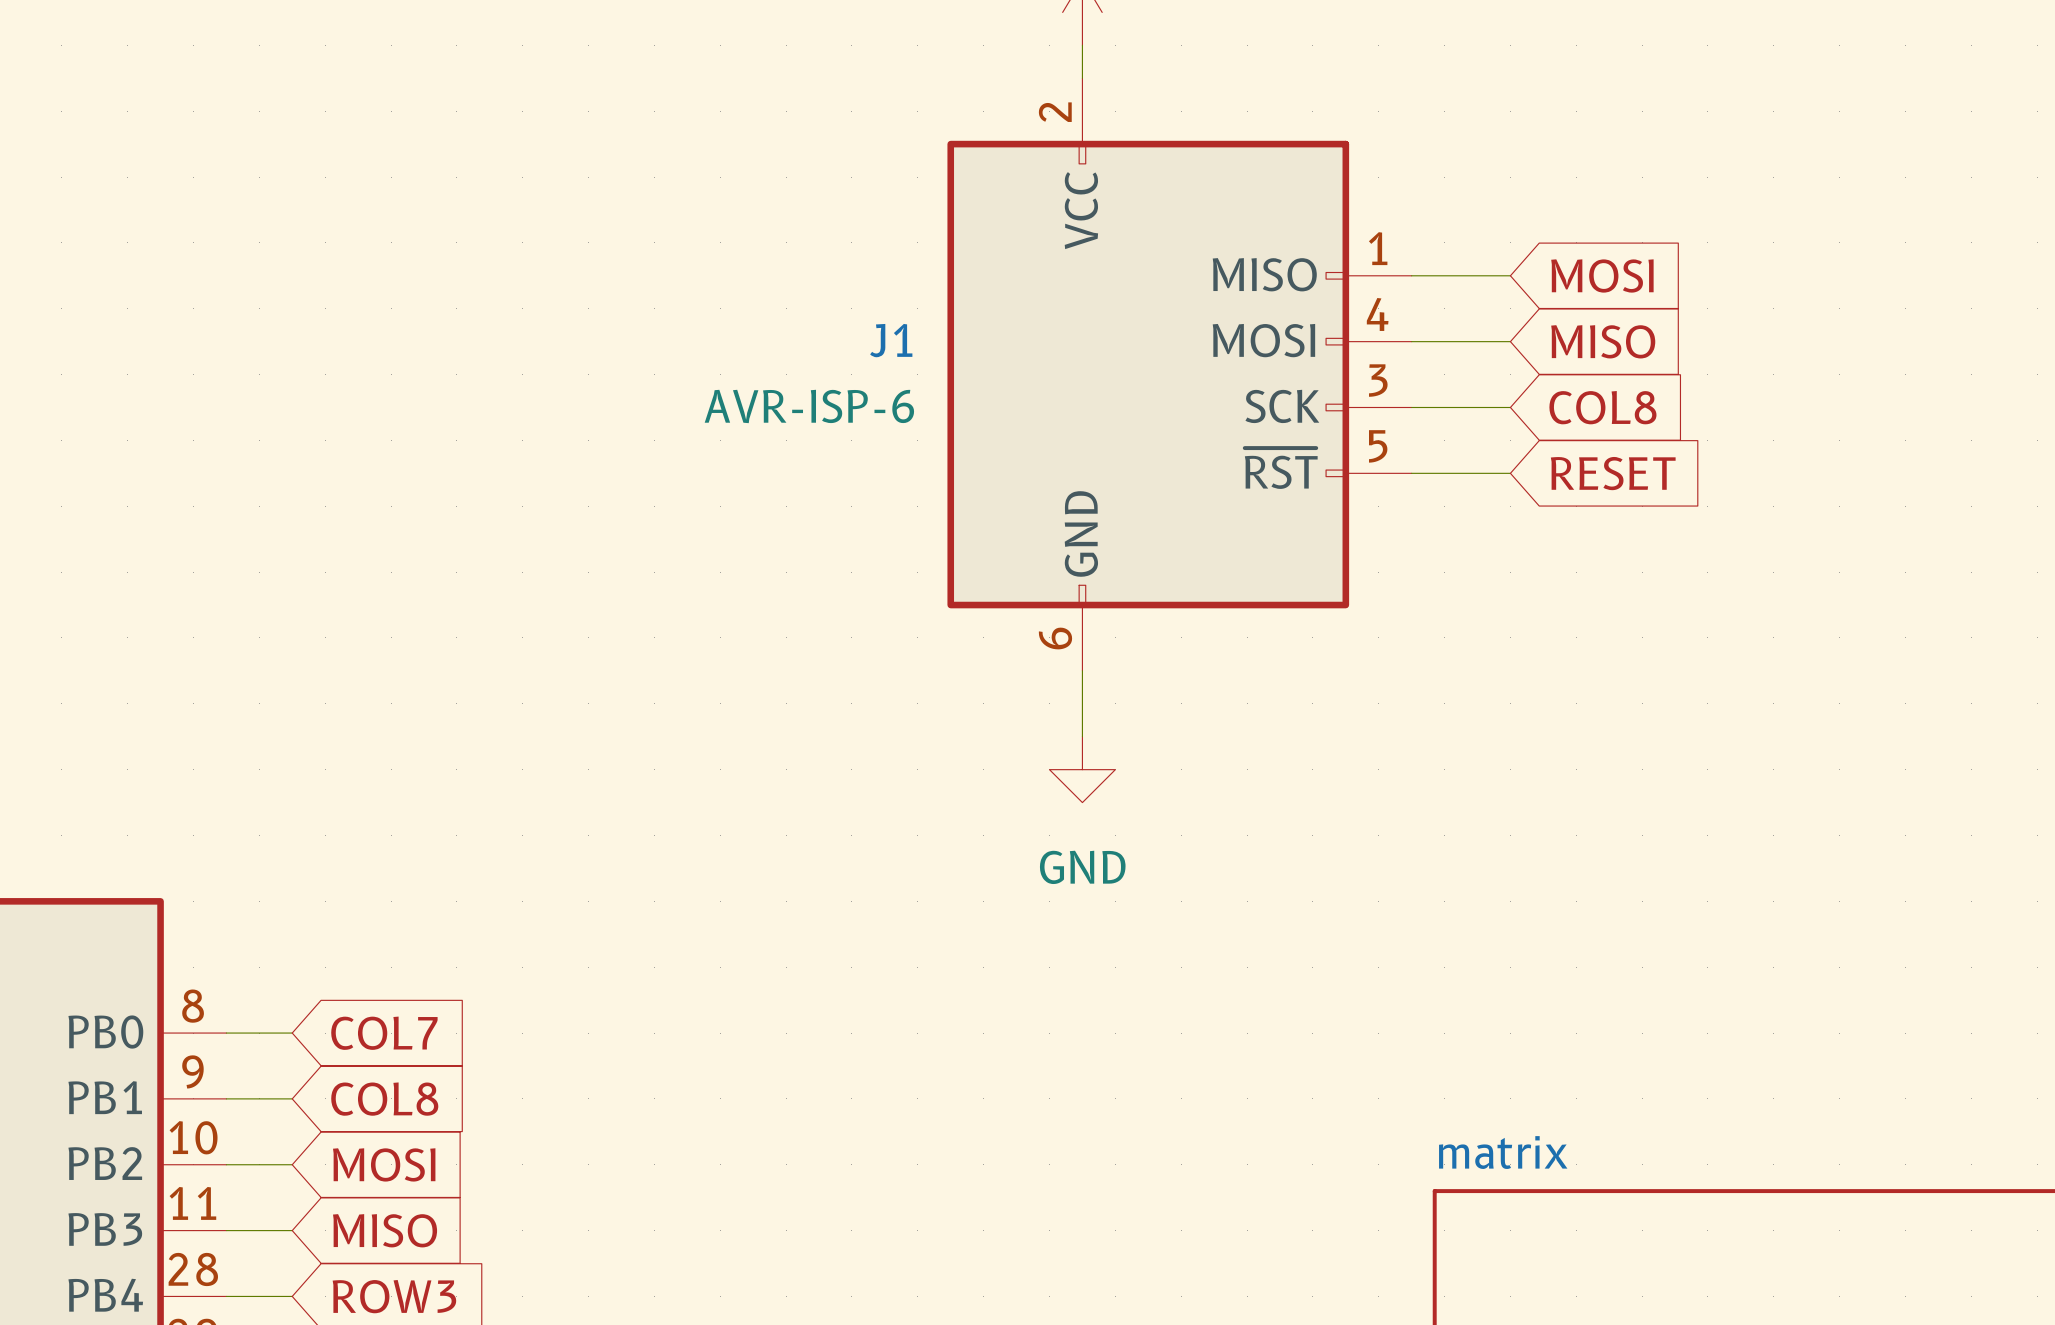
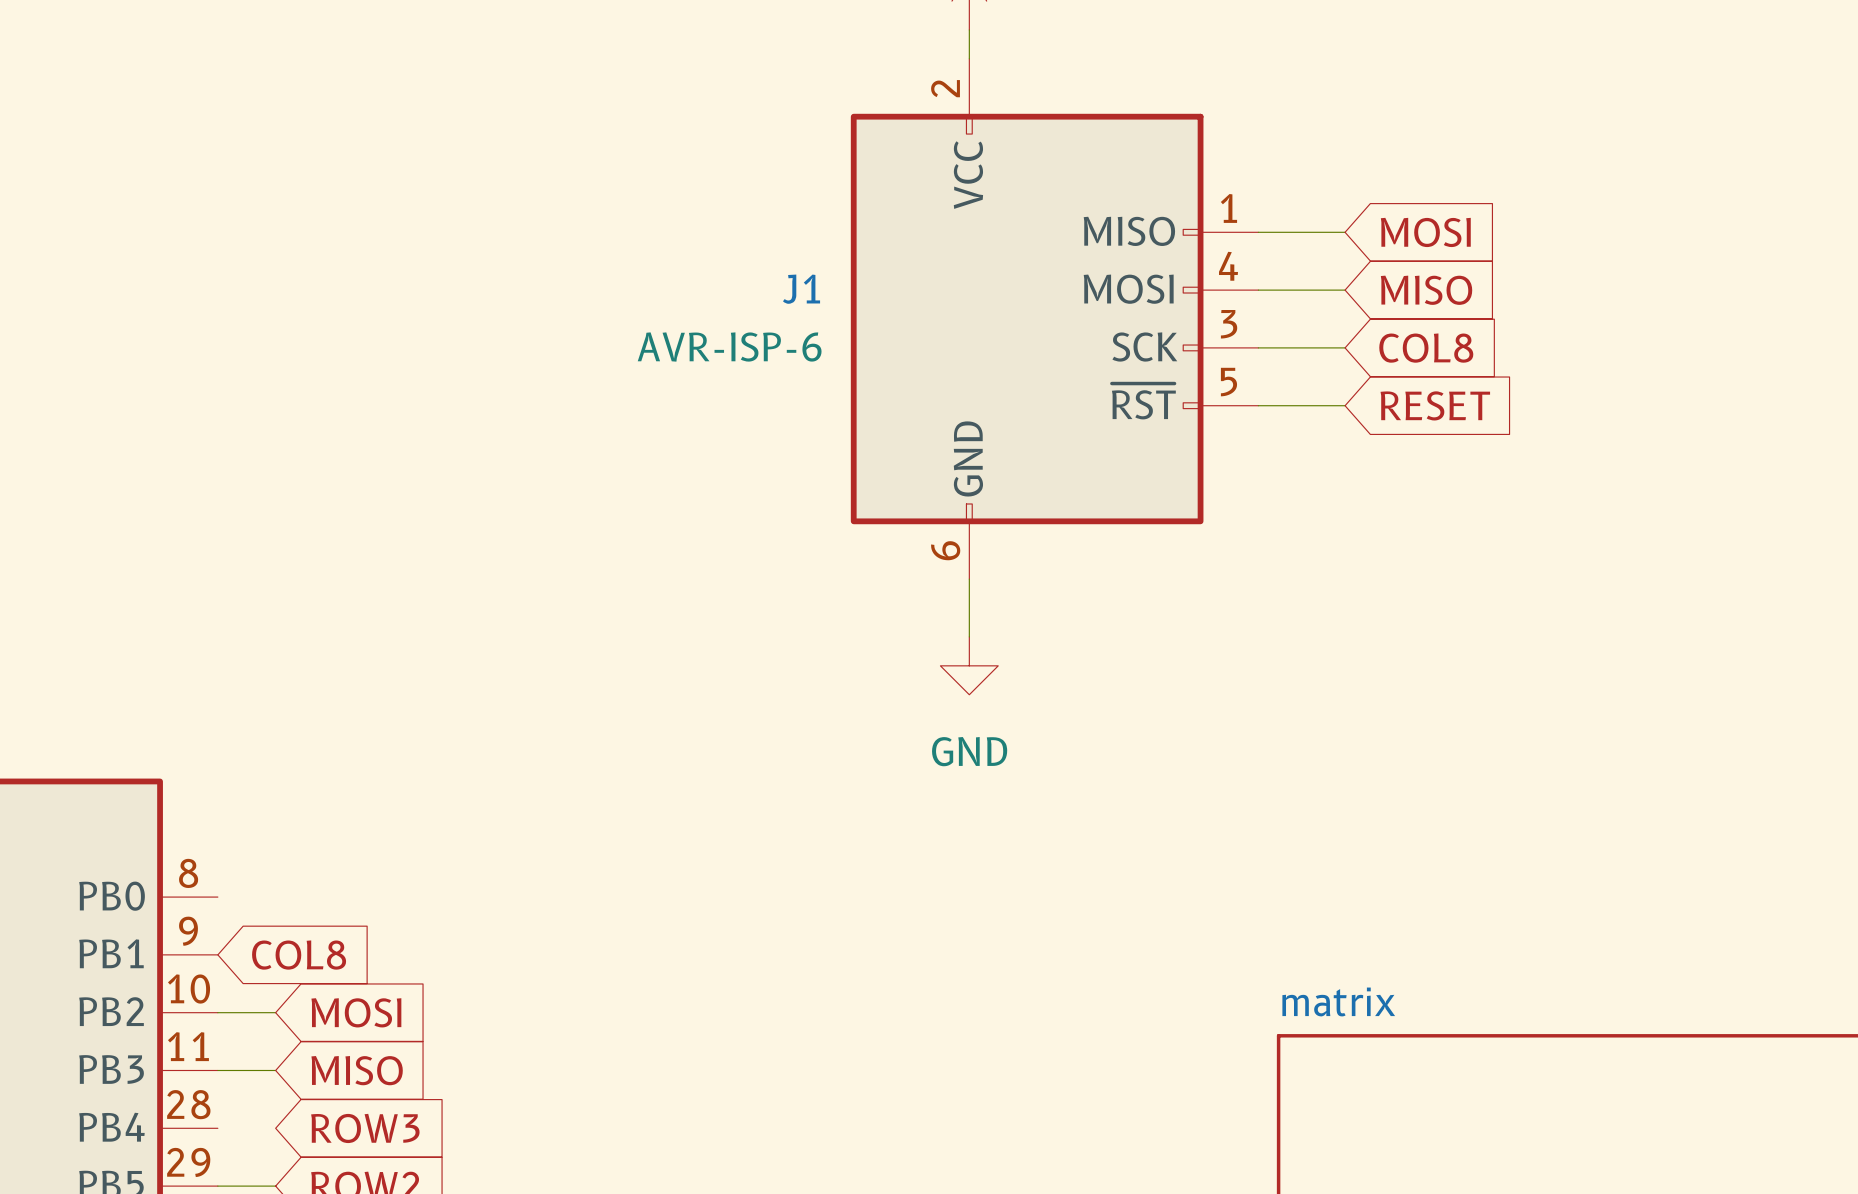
wire: (226, 1033) (292, 1033) -> none
global label: COL7 (384, 1033) -> none
wire: (226, 1098) (292, 1098) -> none
global label position: COL8 (384, 1099) -> COL8 (299, 955)
wire: (226, 1296) (292, 1296) -> none

